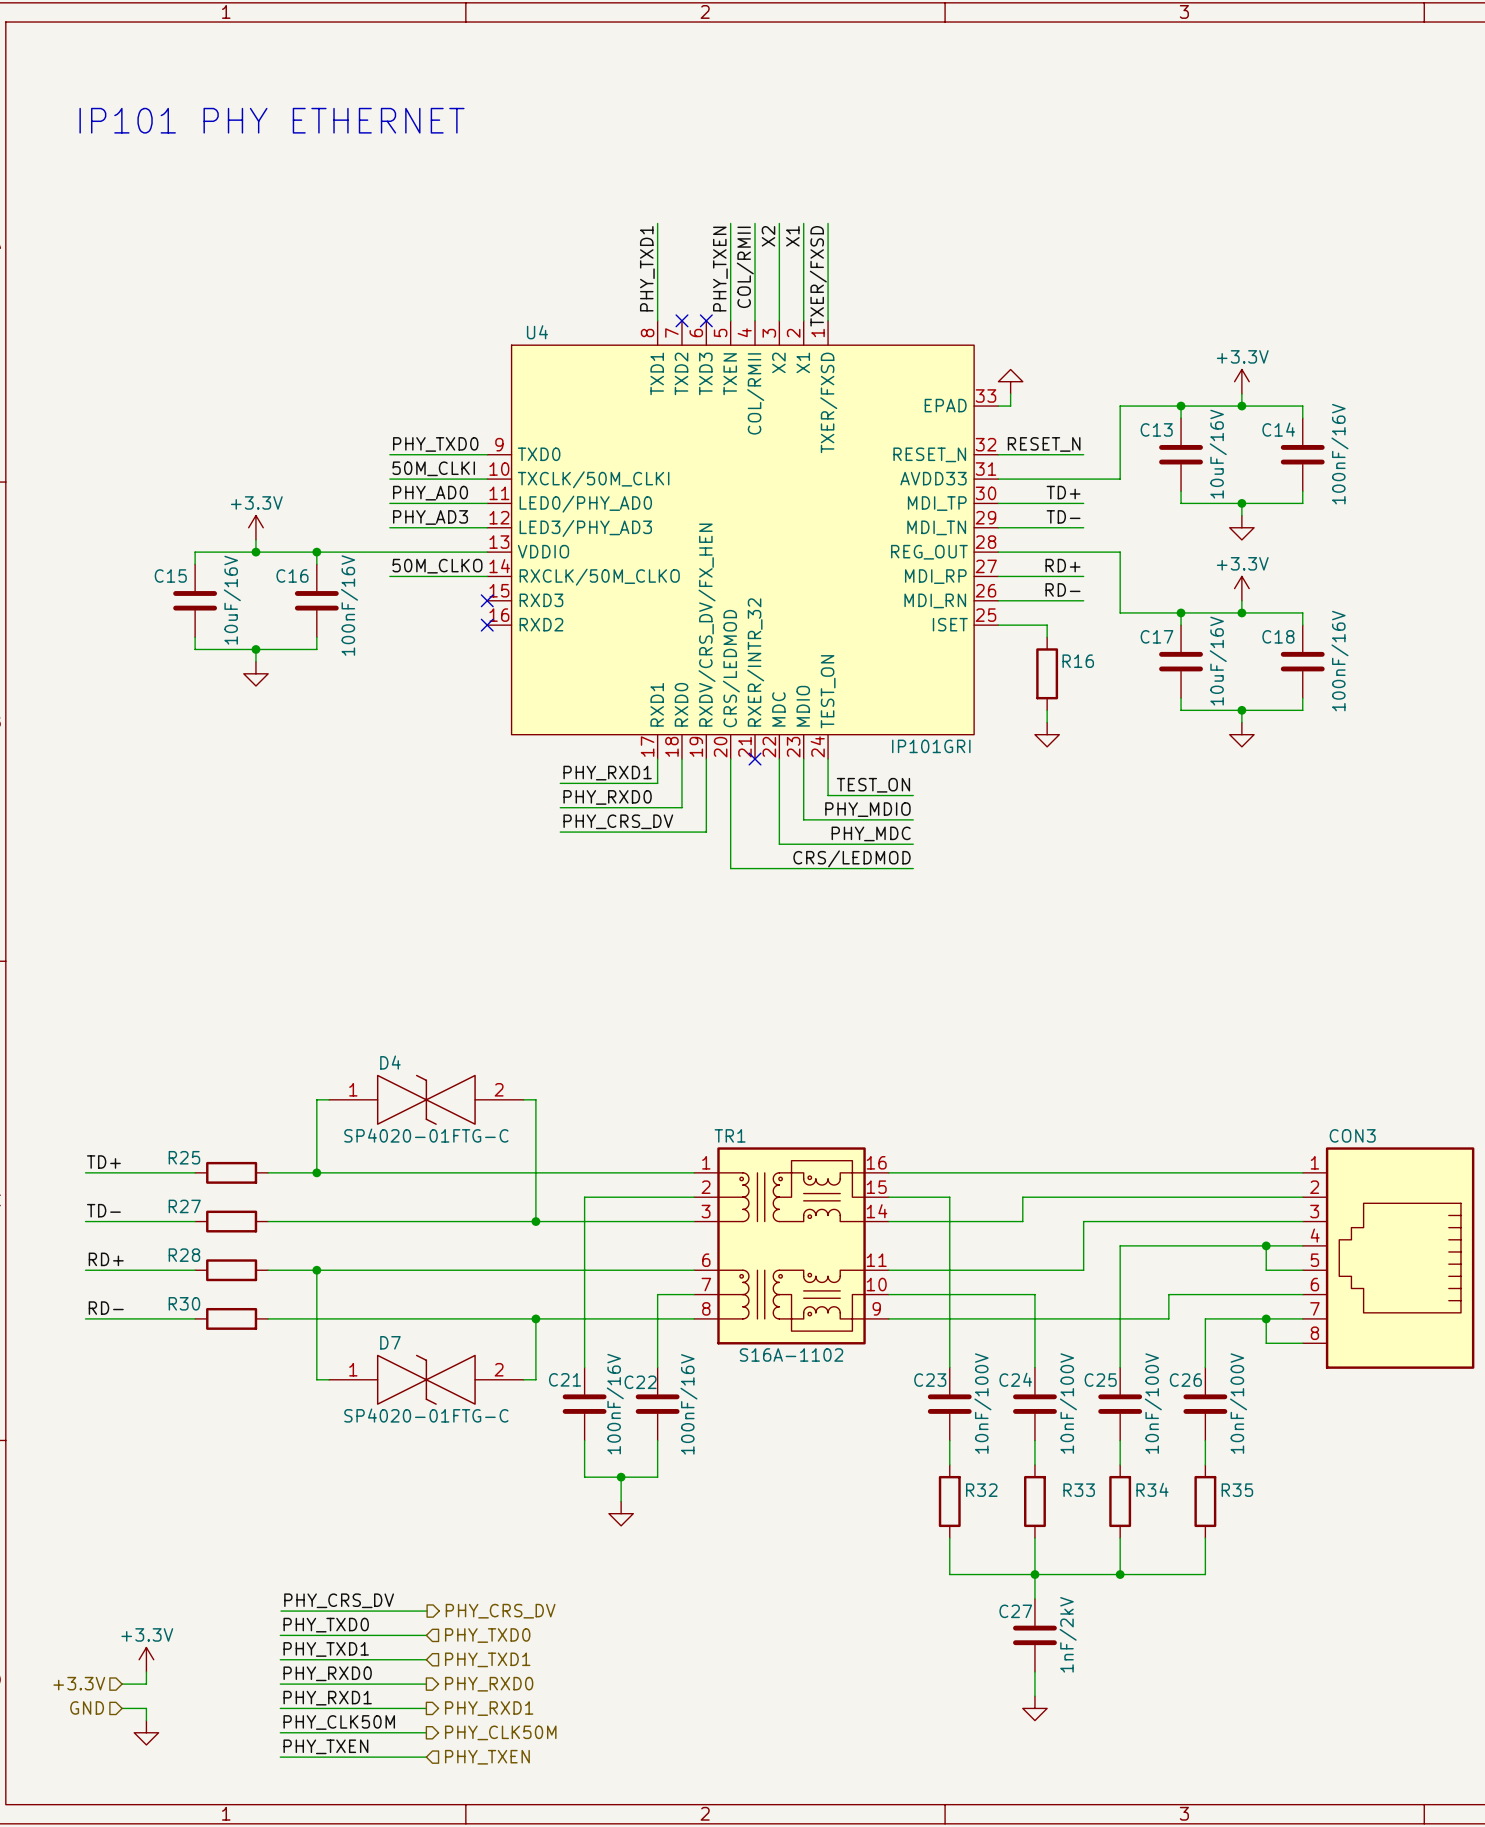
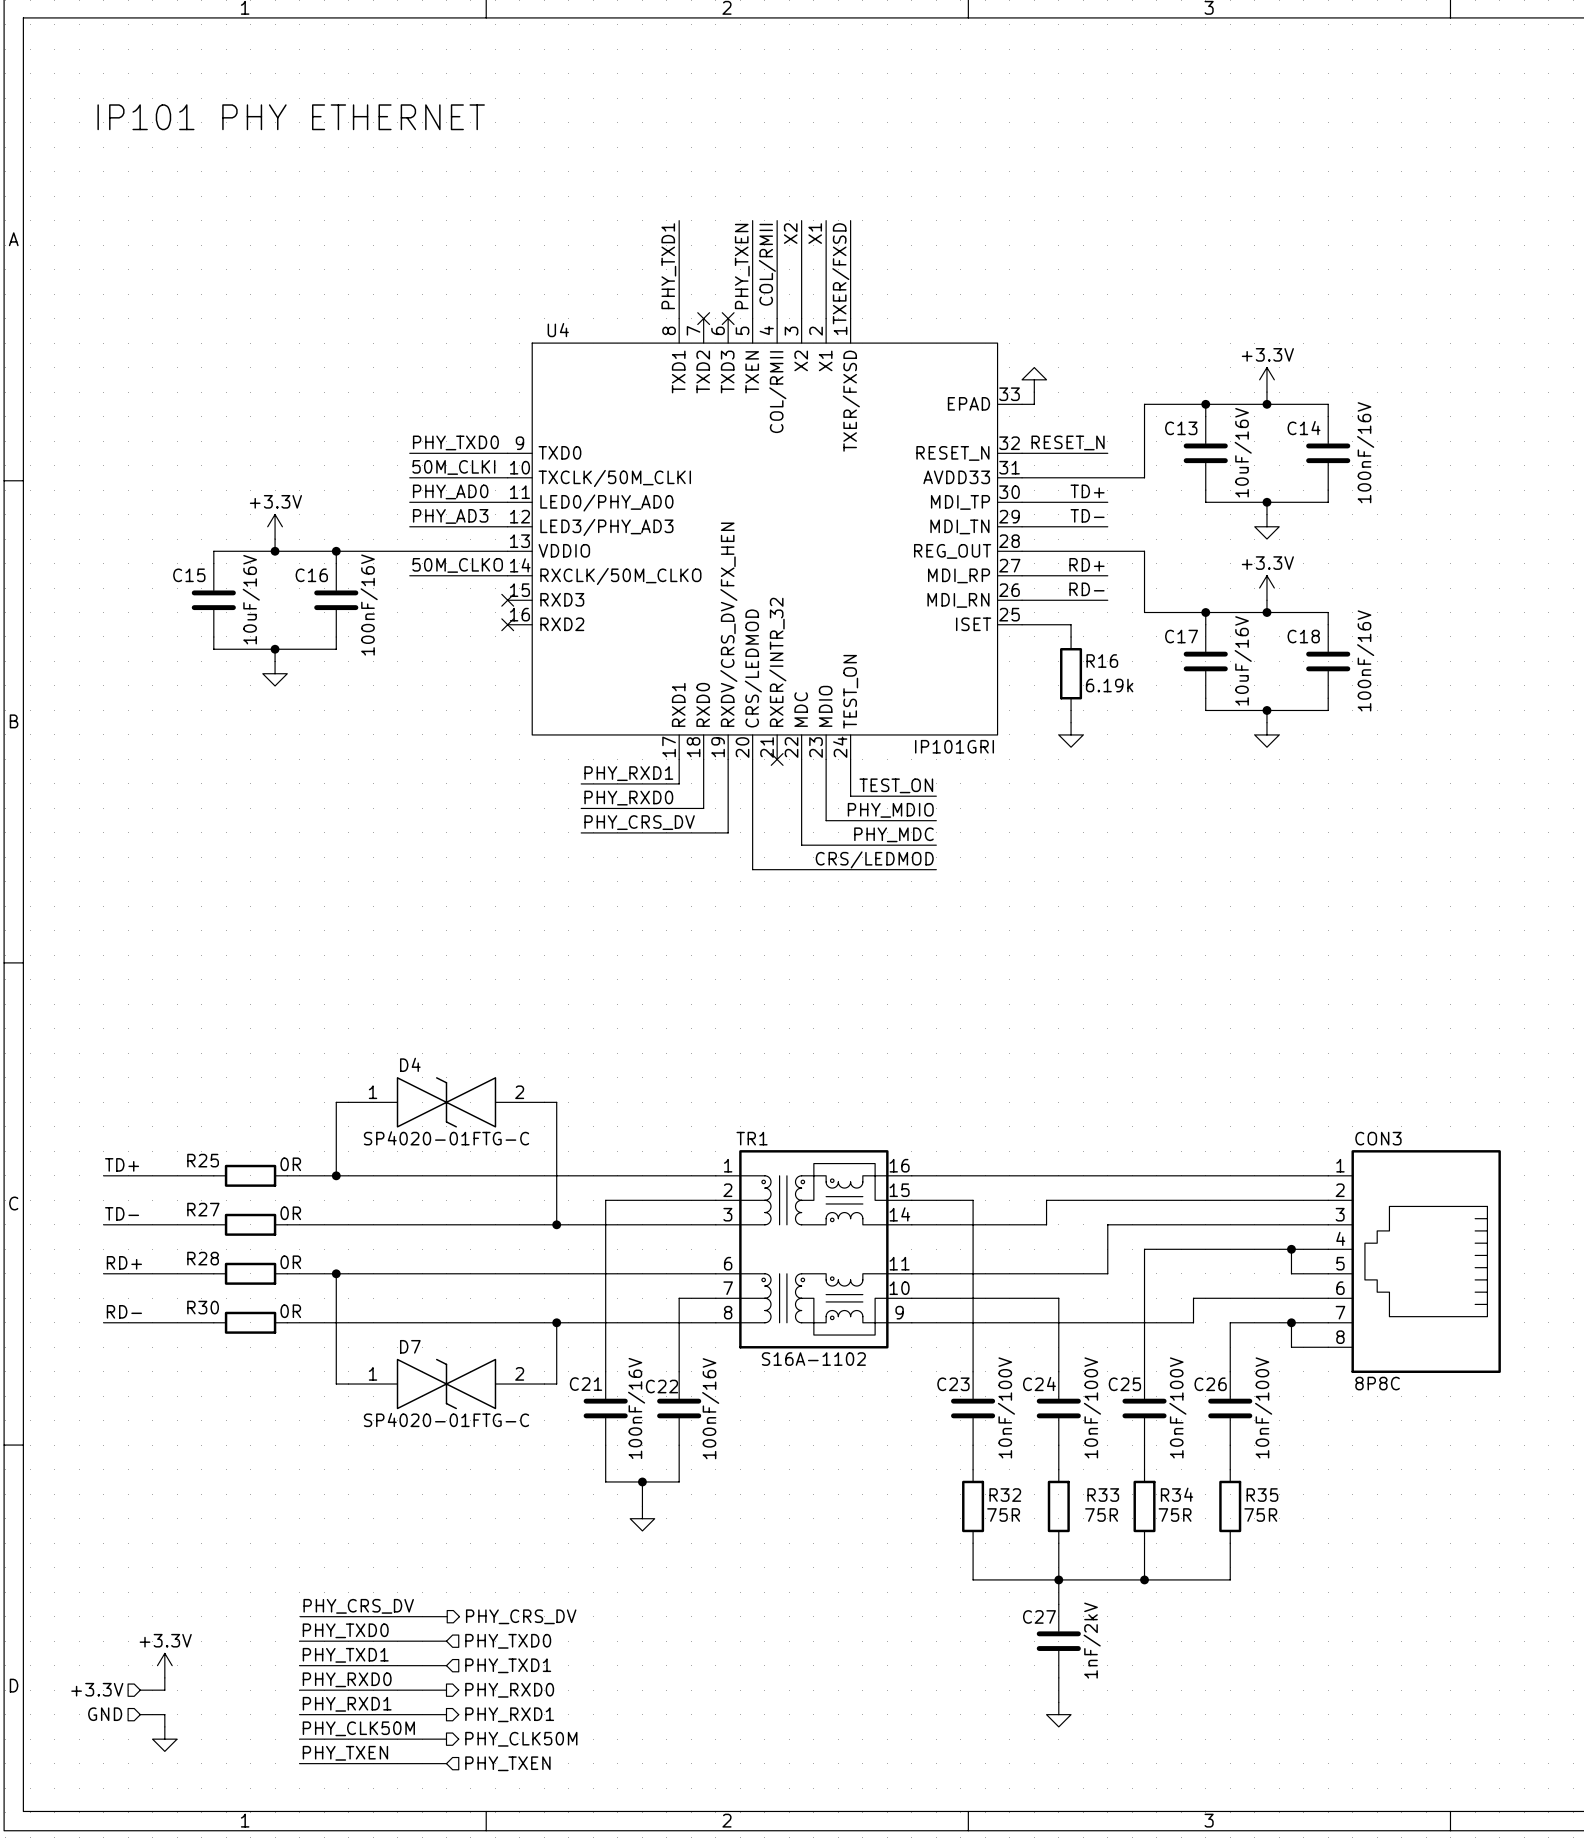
R16 value: none -> 6.19k (1109, 685)
R25 value: none -> 0R (290, 1164)
R27 value: none -> 0R (290, 1213)
R28 value: none -> 0R (290, 1262)
R30 value: none -> 0R (290, 1311)
CON3 value: none -> 8P8C (1377, 1383)
R32 value: none -> 75R (1003, 1515)
R33 value: none -> 75R (1101, 1515)
R34 value: none -> 75R (1175, 1515)
R35 value: none -> 75R (1260, 1515)

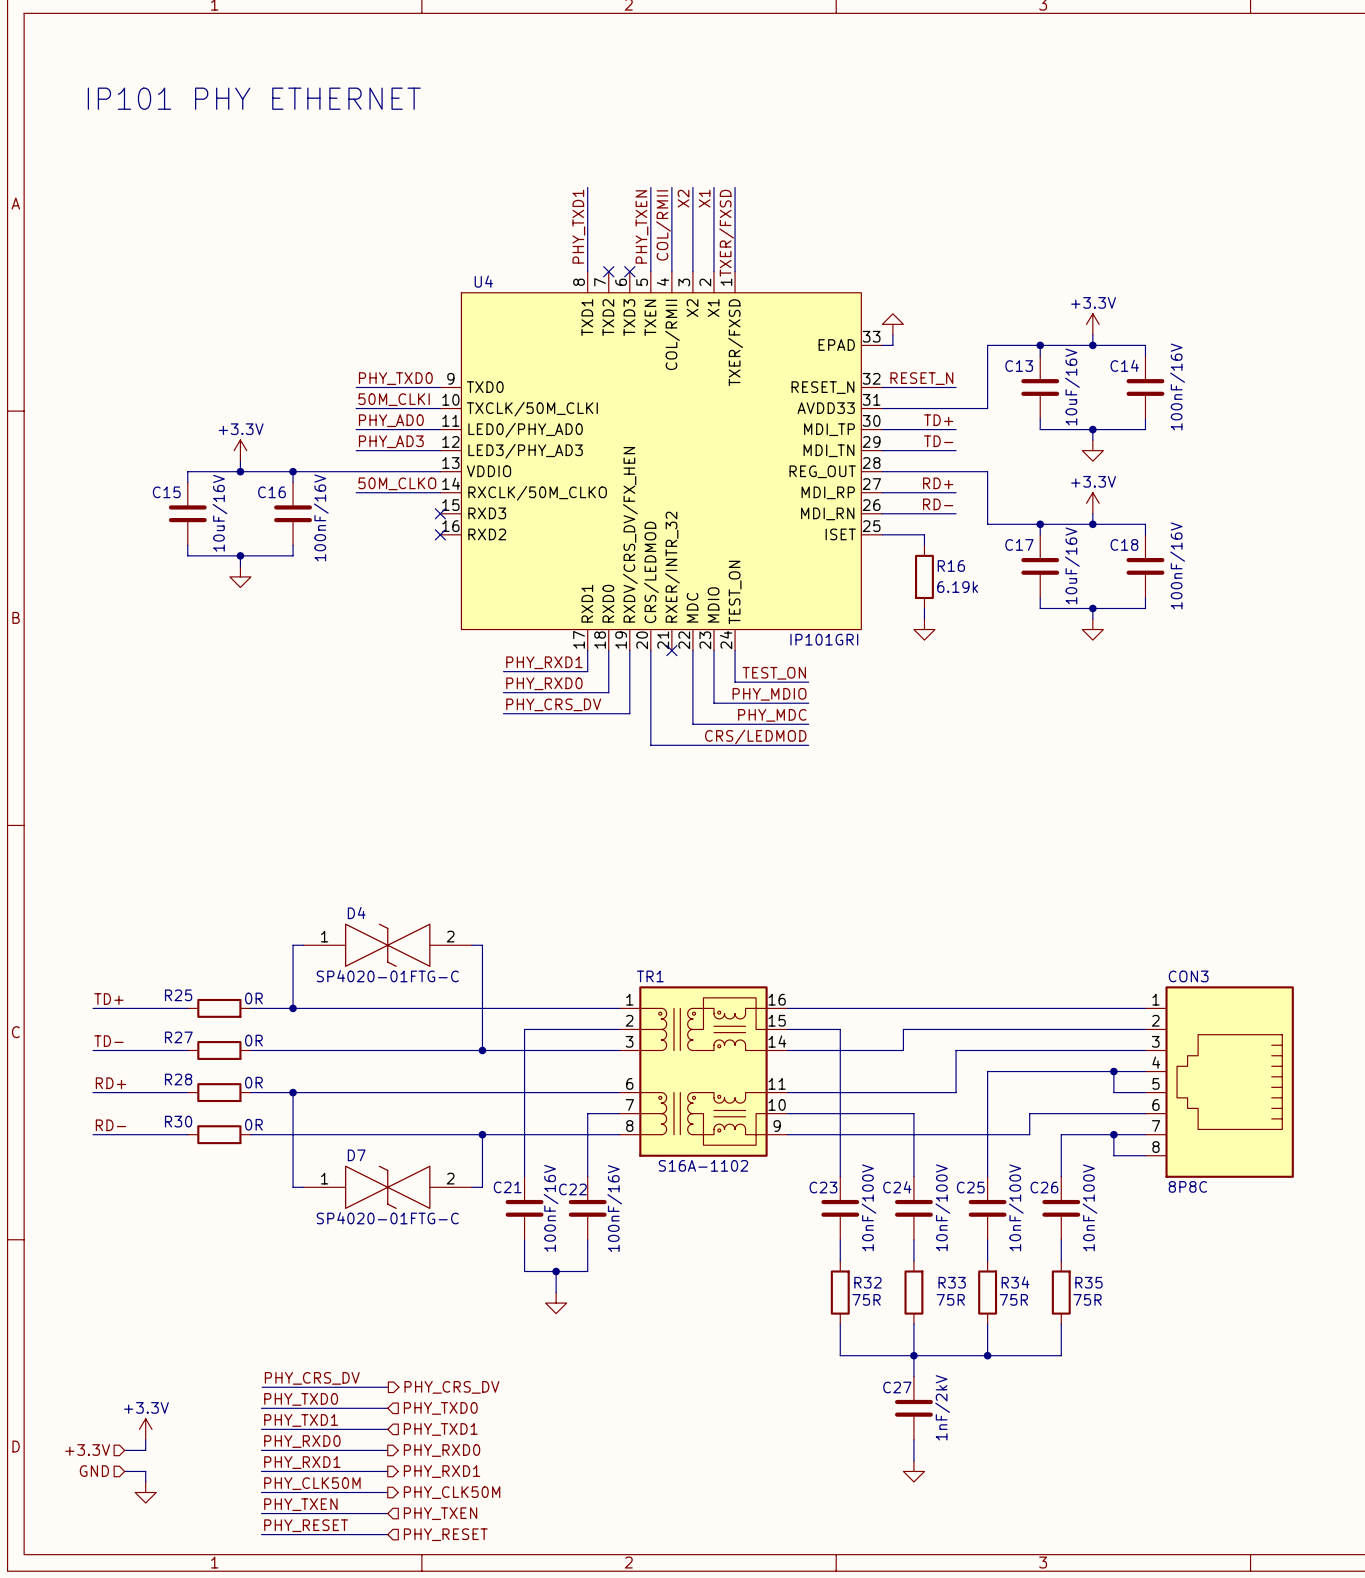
label: none -> PHY_RESET (306, 1525)
wire: none -> (261, 1534) (387, 1534)
hierarchical label: none -> PHY_RESET (445, 1534)

